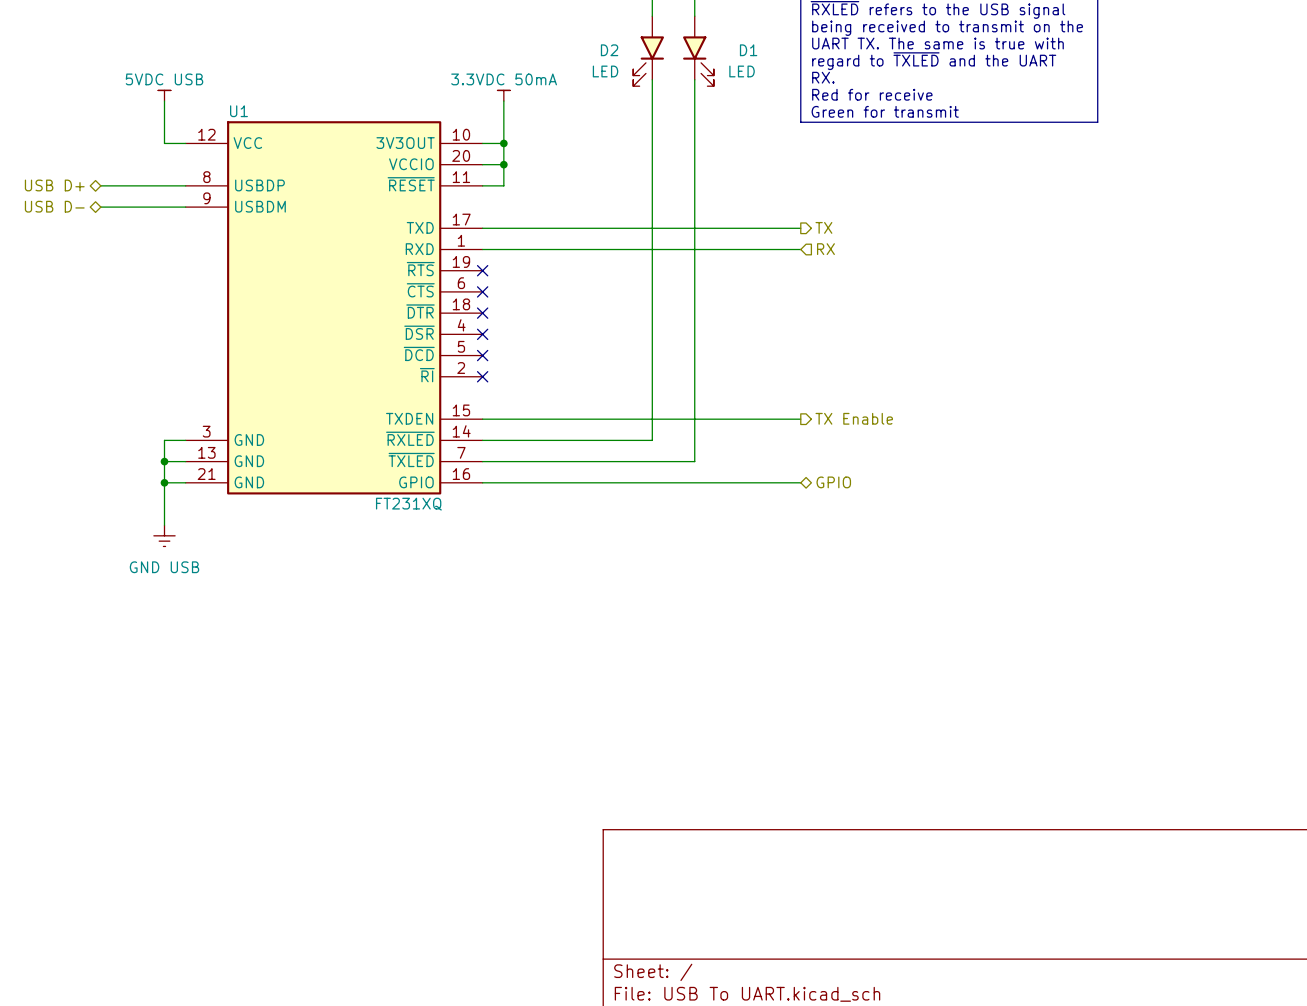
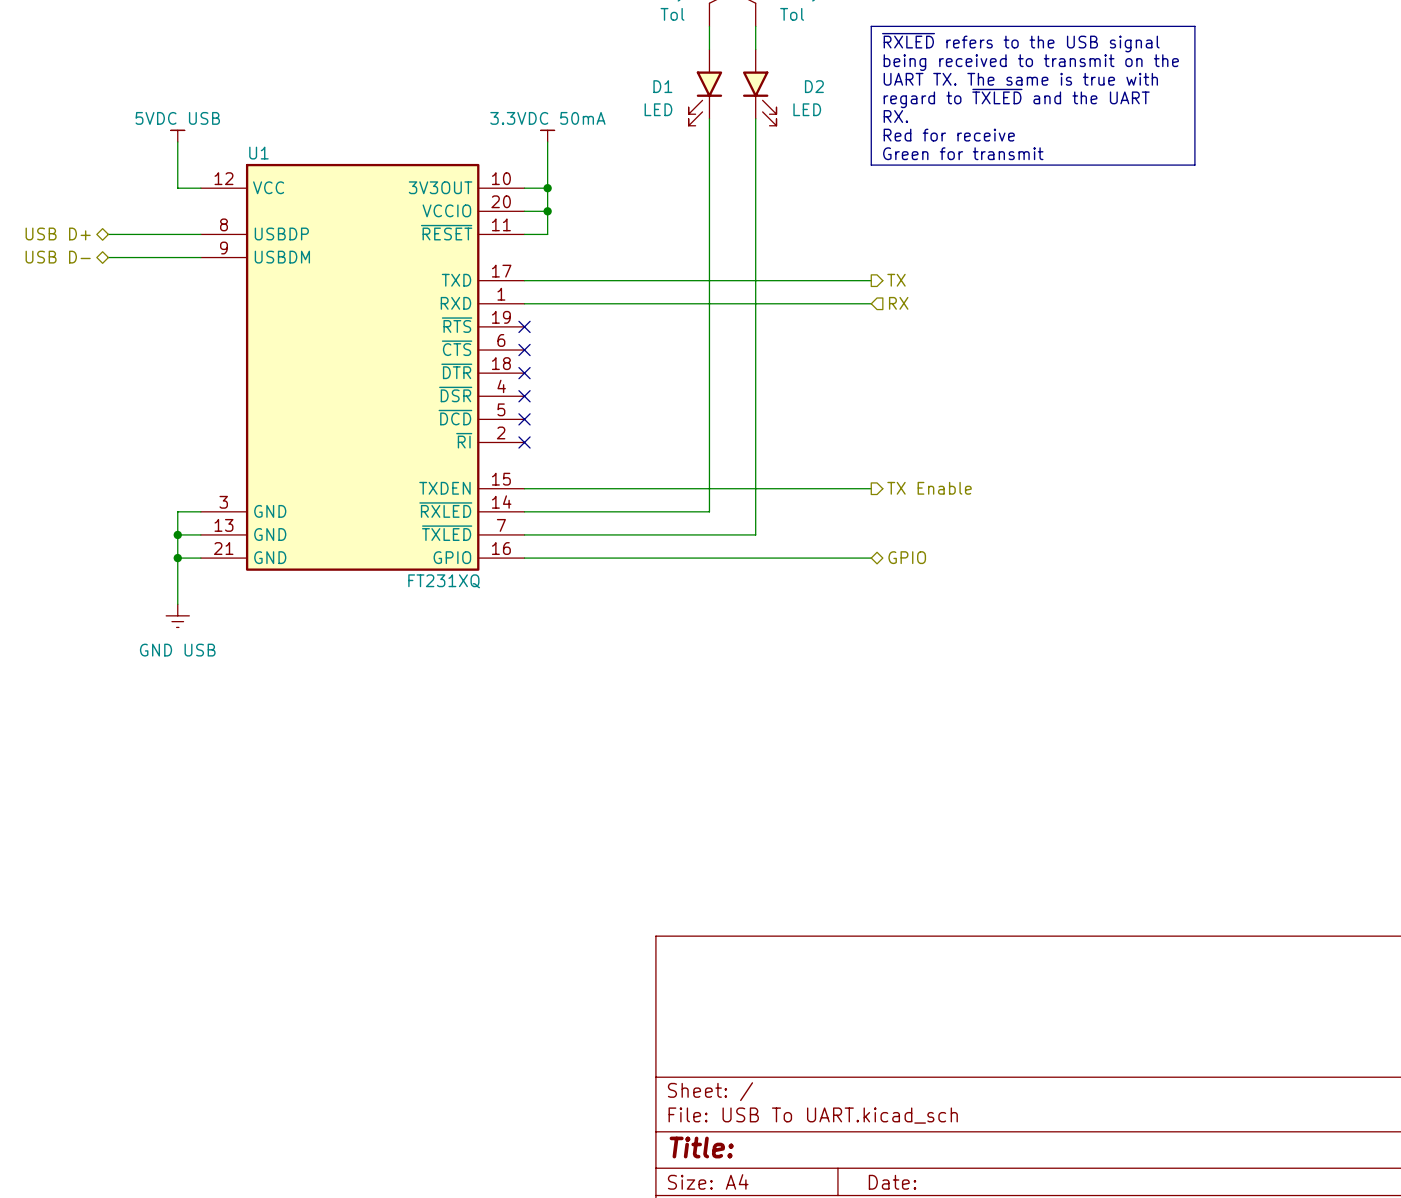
D2 name: D2 (609, 50) -> D1 (662, 86)
D1 name: D1 (748, 50) -> D2 (814, 86)

